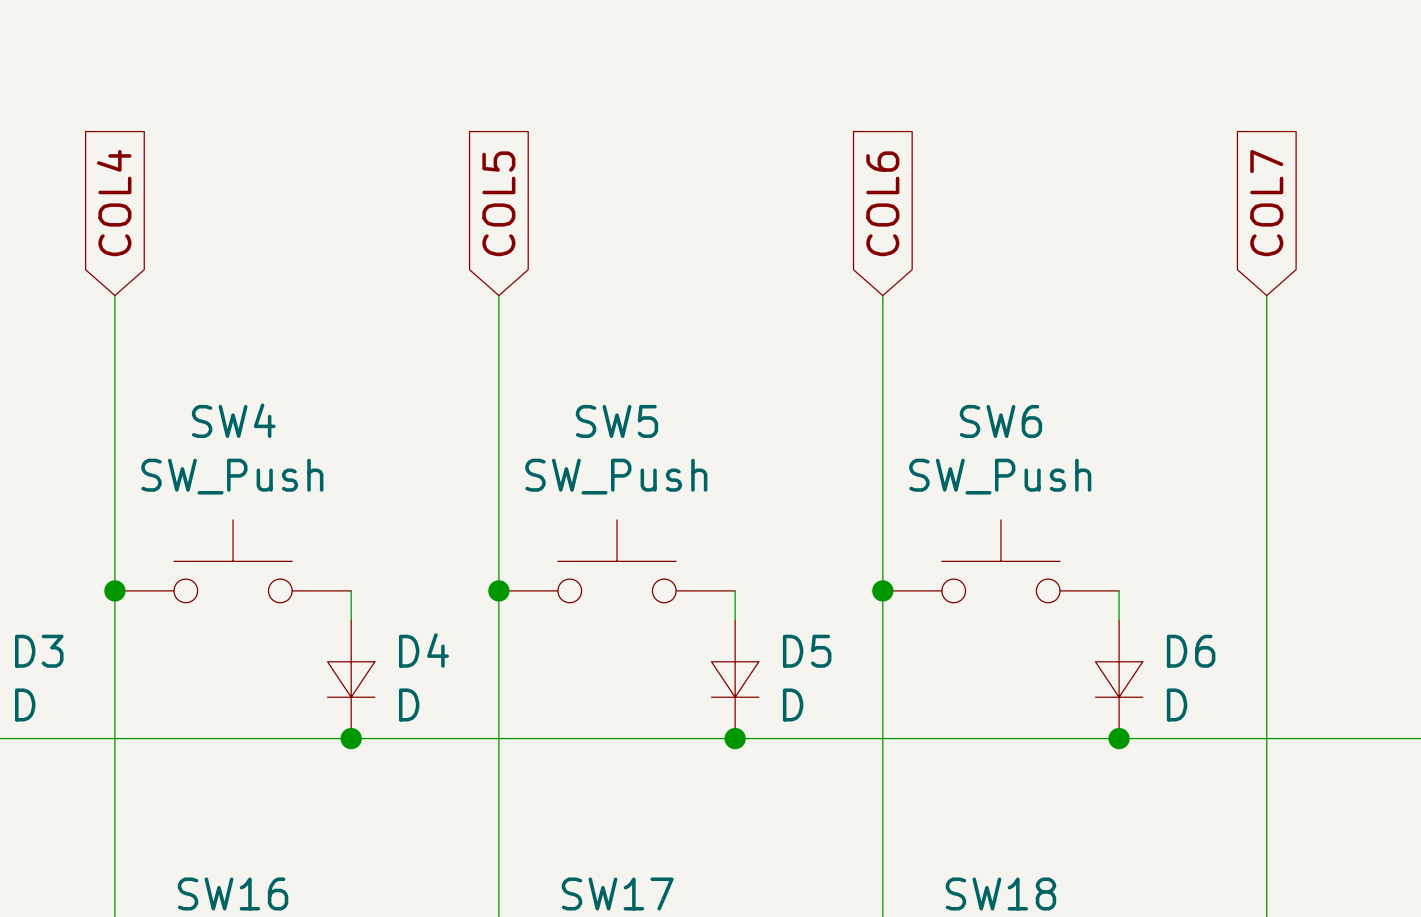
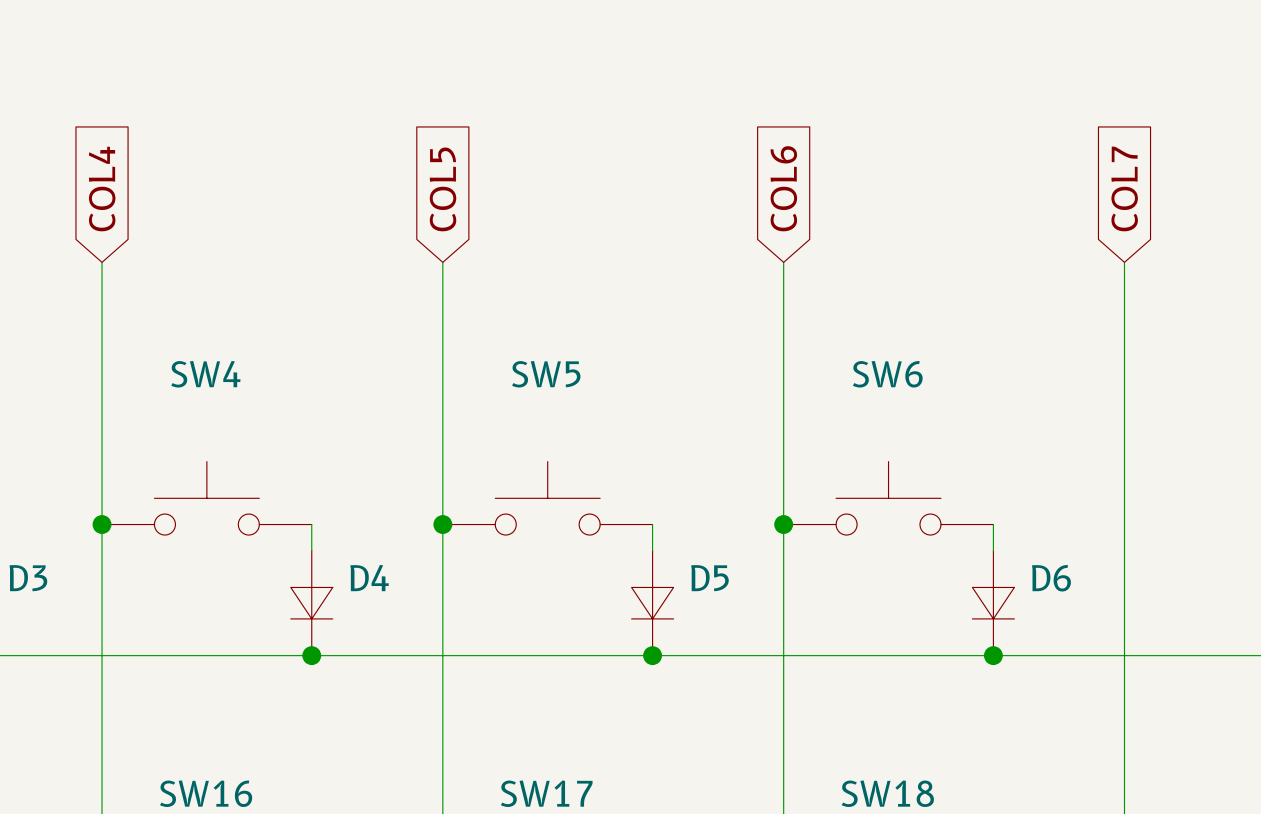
SW4 value: SW_Push (232, 476) -> none
SW5 value: SW_Push (616, 476) -> none
SW6 value: SW_Push (1000, 476) -> none
D3 value: D (25, 704) -> none
D4 value: D (409, 704) -> none
D5 value: D (793, 704) -> none
D6 value: D (1177, 704) -> none

